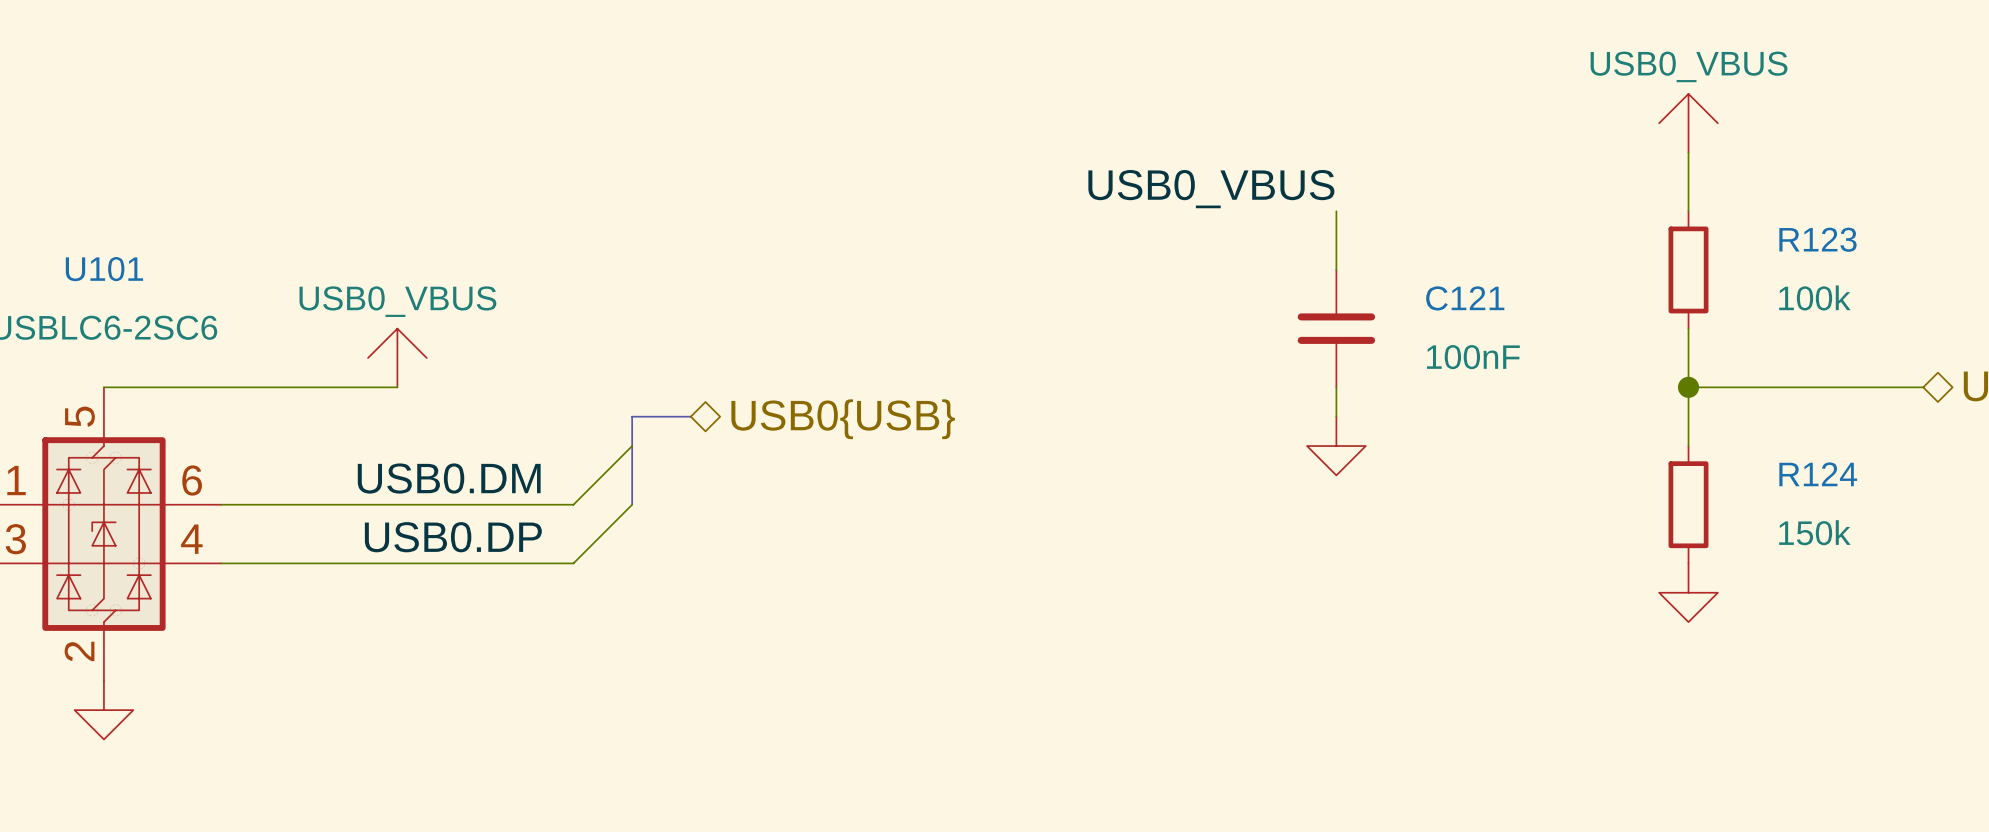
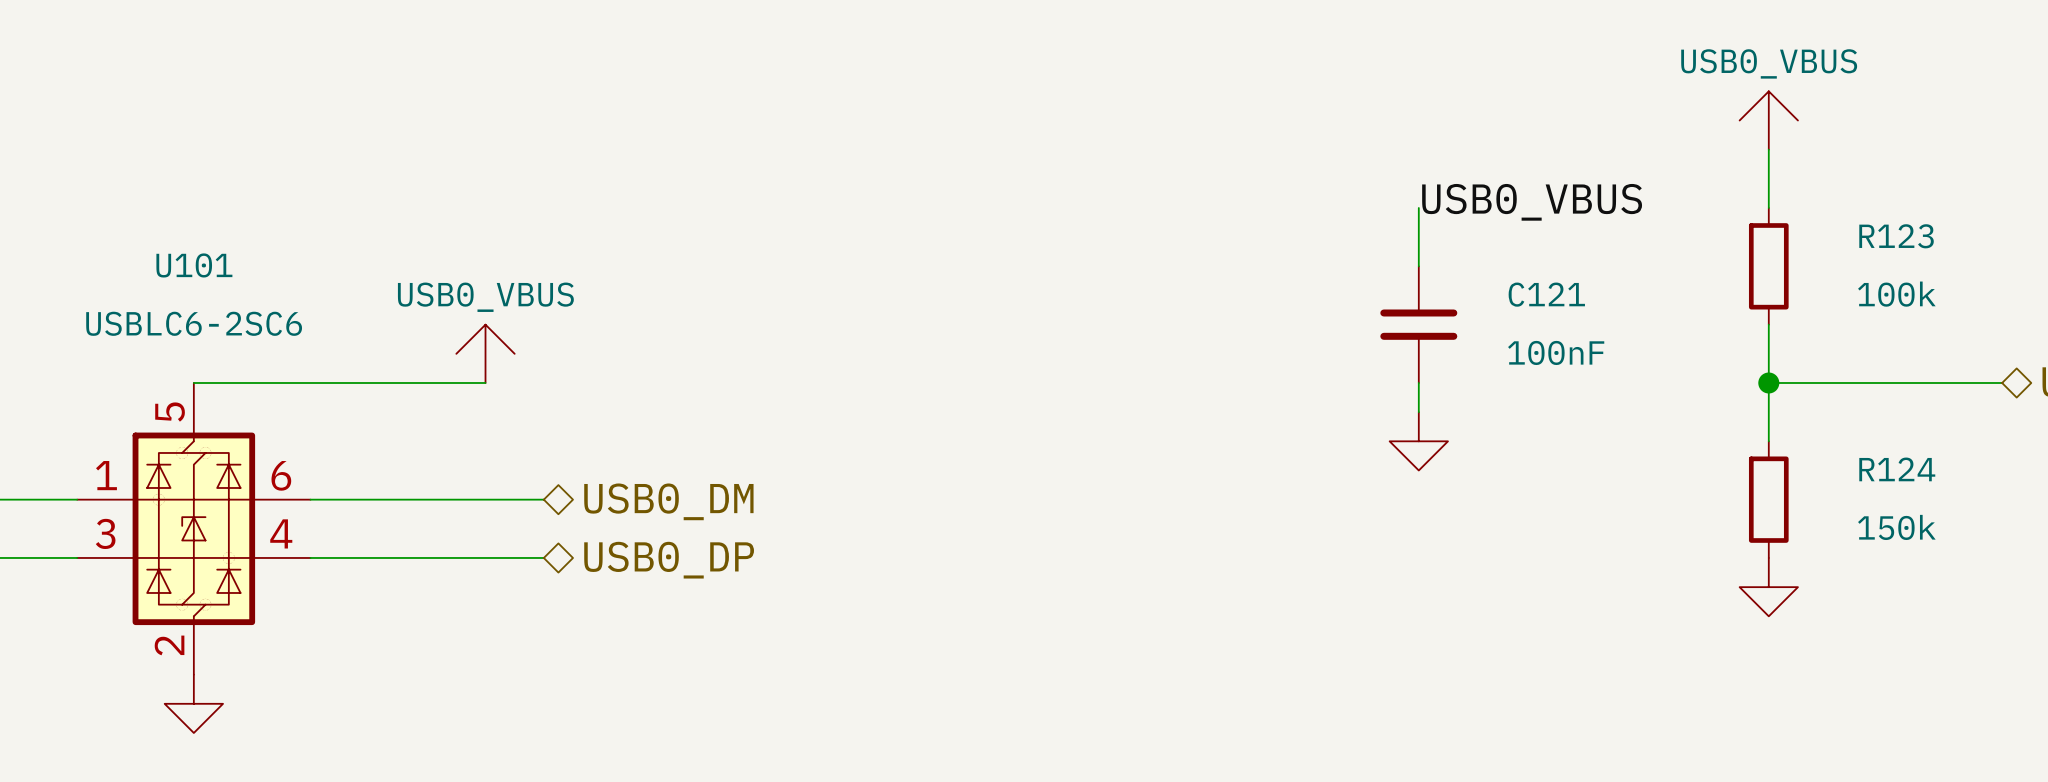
label position: USB0_VBUS (1211, 189) -> USB0_VBUS (1532, 202)
bus: (690, 416) (632, 416) (632, 504) -> none
hierarchical label: USB0{USB} (843, 419) -> none
wire: (632, 446) (573, 504) (456, 504) -> none
label: USB0.DM (449, 478) -> none
wire: (632, 504) (573, 563) (456, 563) -> none
hierarchical label: none -> USB0_DM (668, 501)
label: USB0.DP (453, 537) -> none
hierarchical label: none -> USB0_DP (669, 560)

